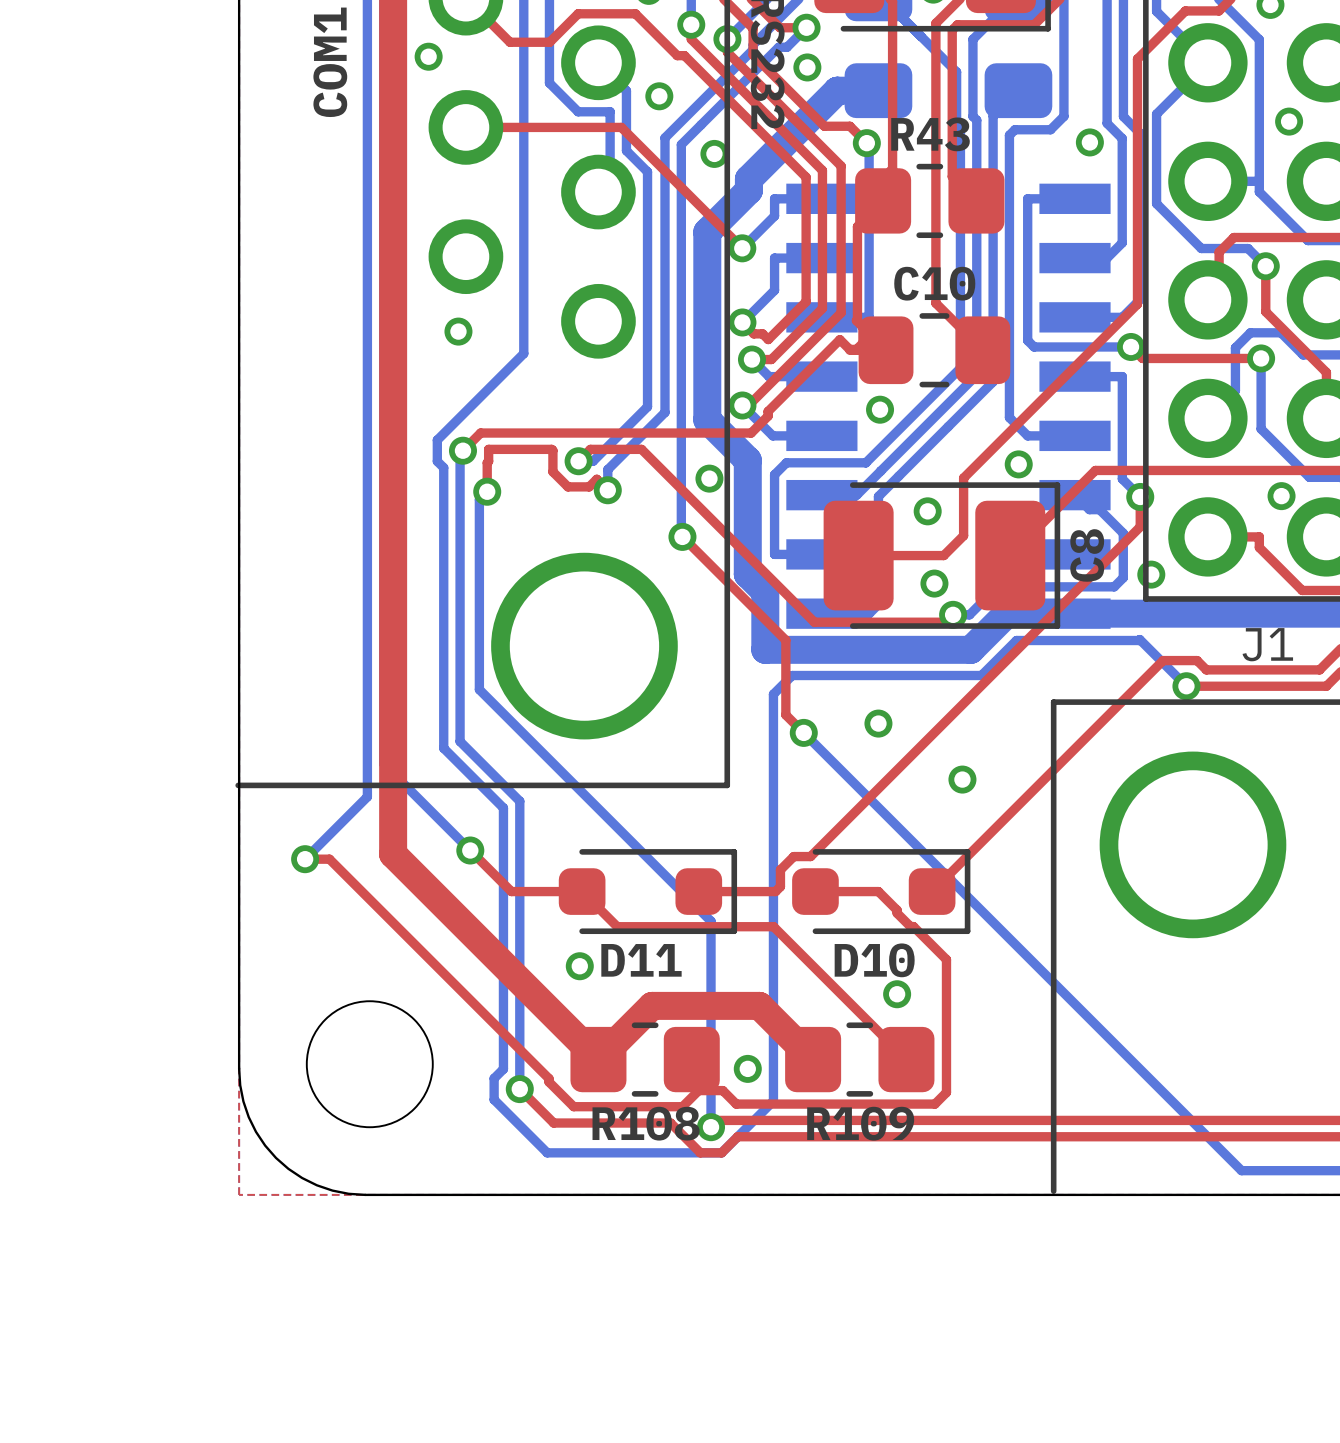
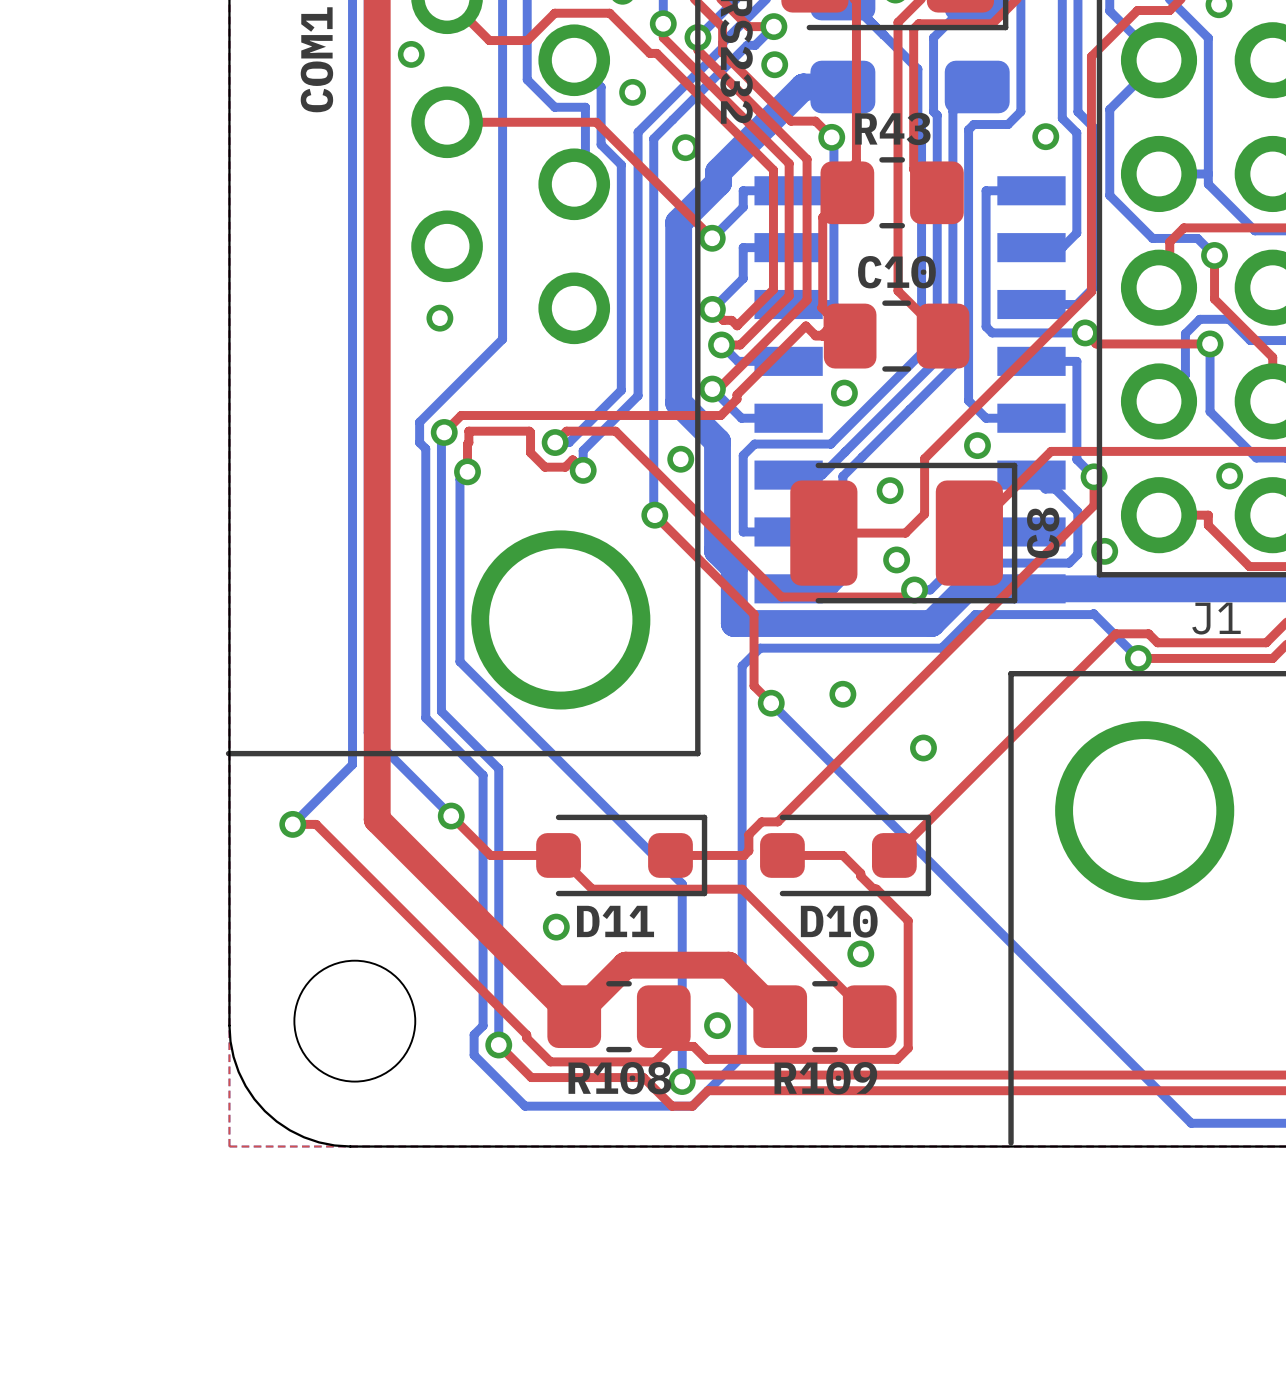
via: (1289, 121) -> none

